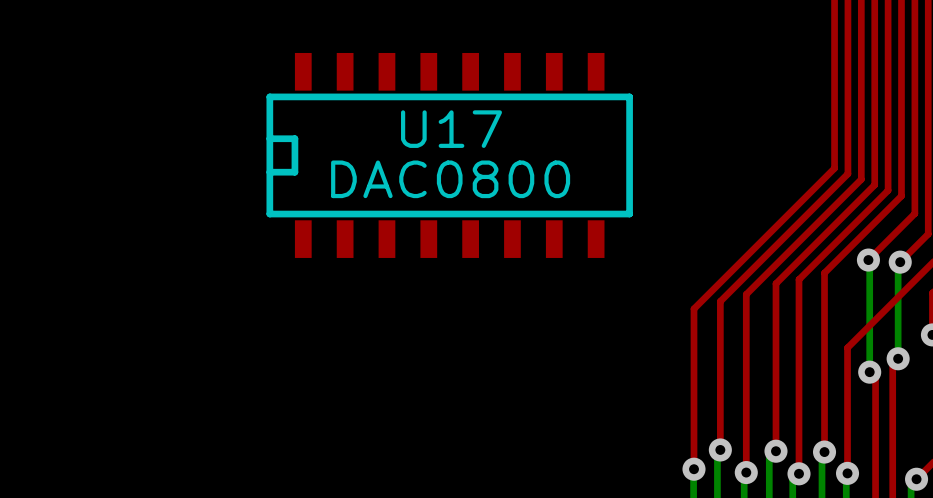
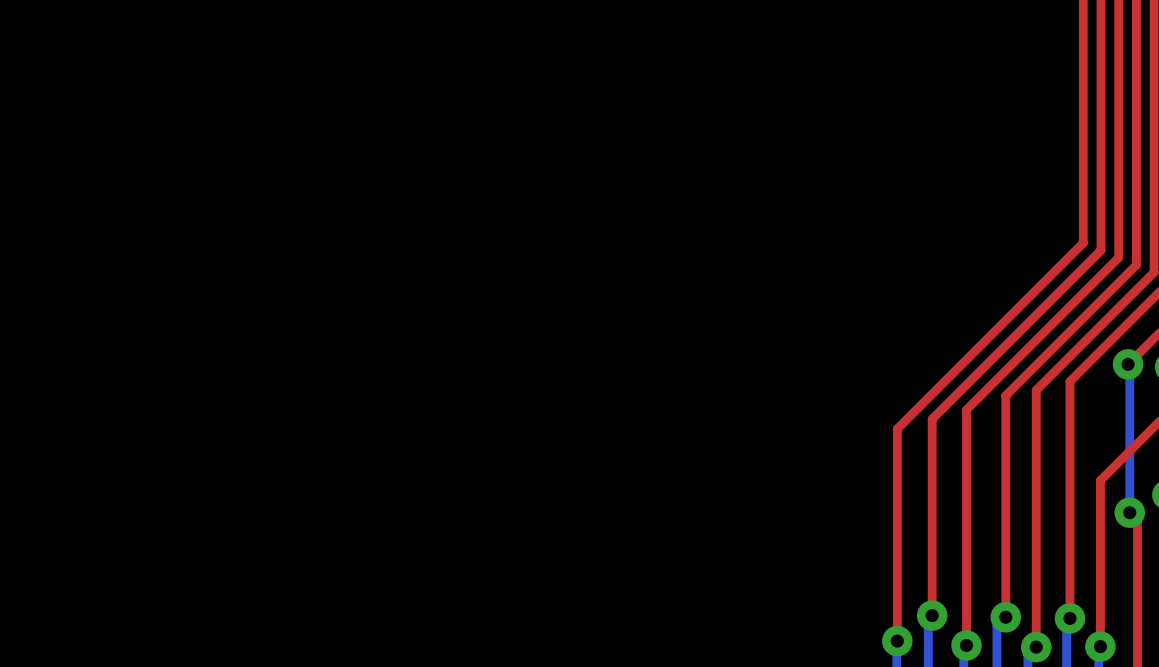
U17: DAC0800 (449, 155) -> none

